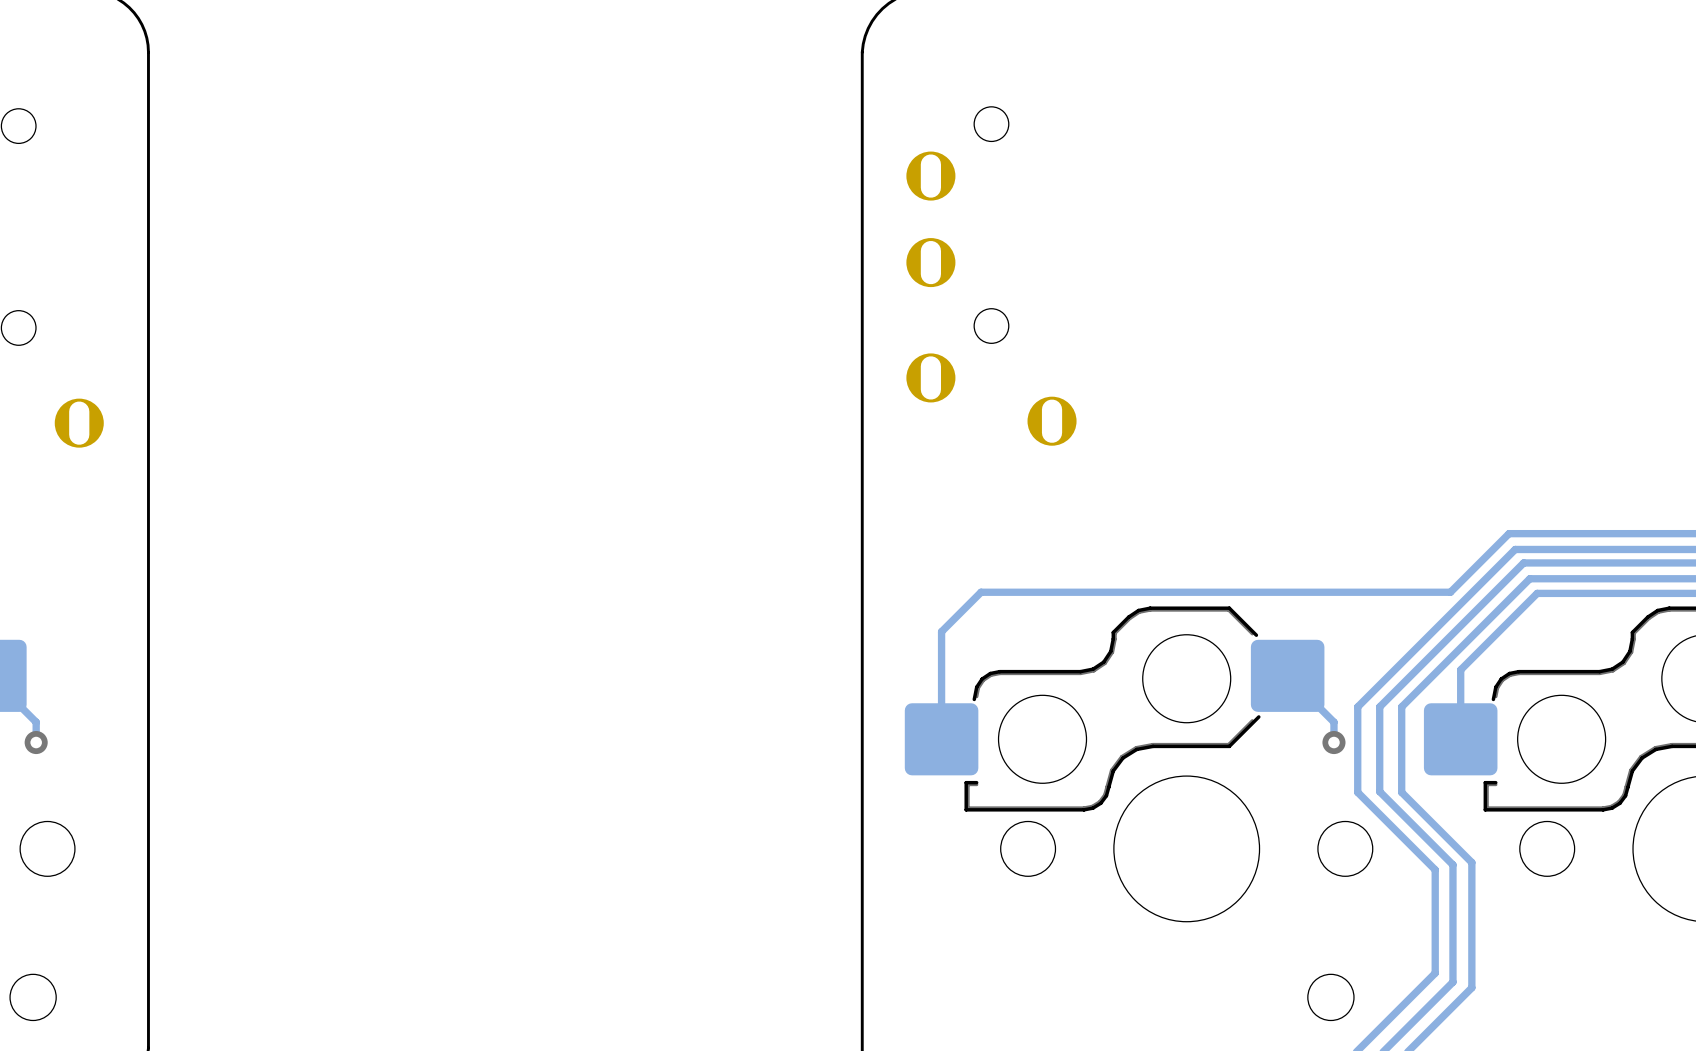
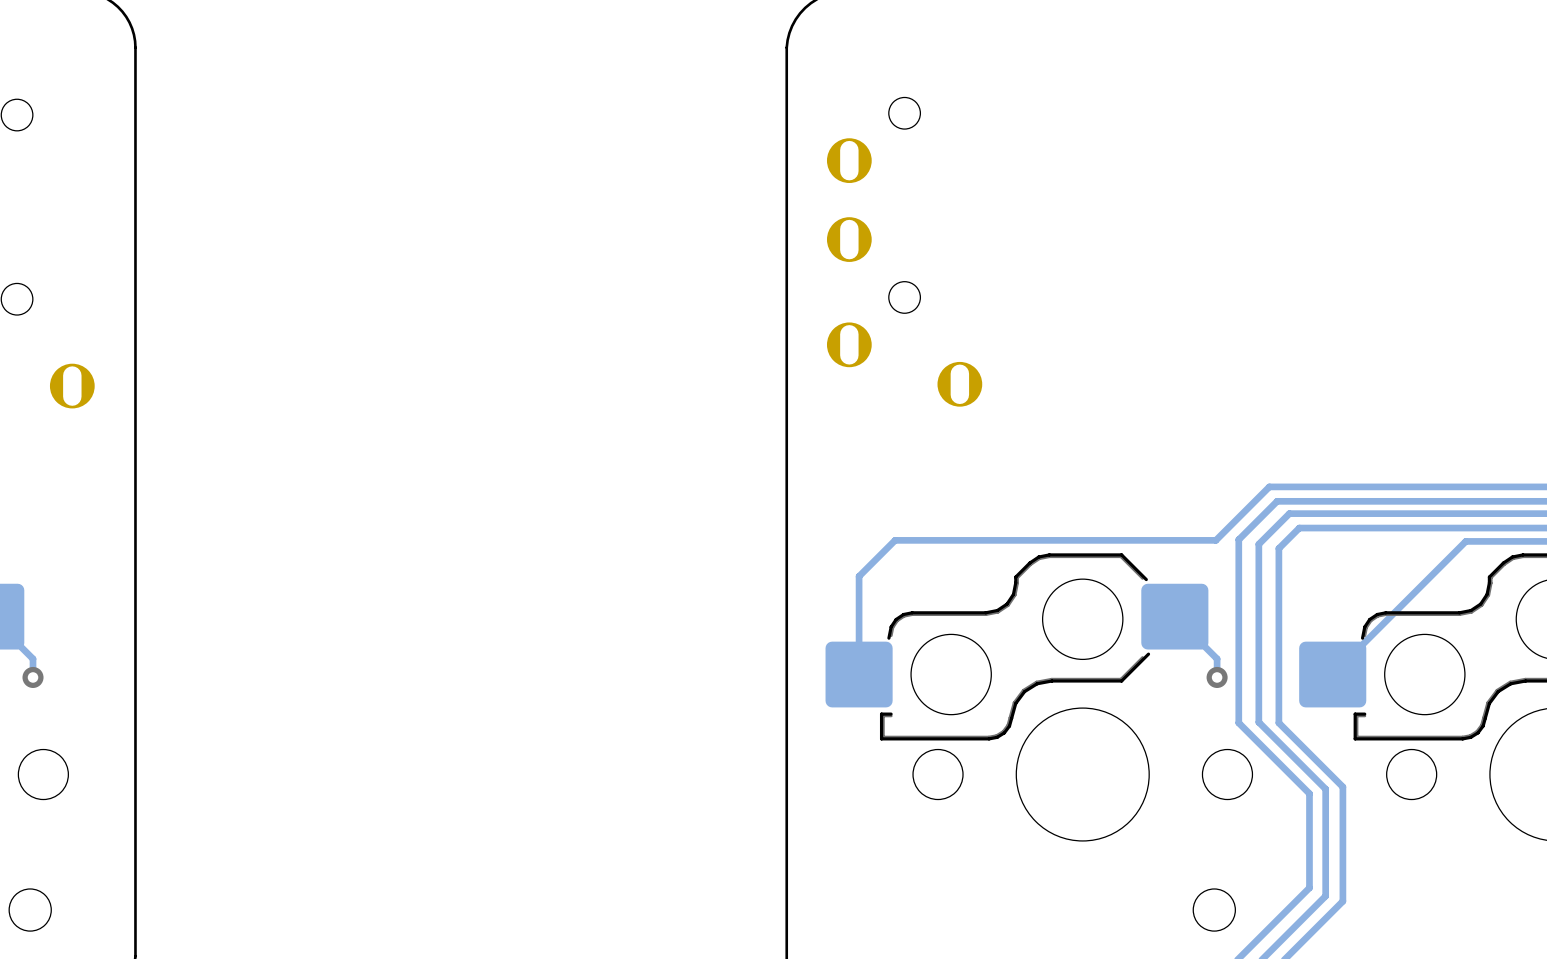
track: (1509, 533) (1450, 592) (1332, 592) -> (1376, 486) (1269, 486) (1215, 540)
track: (1515, 549) (1357, 706) -> (1382, 501) (1277, 501) (1238, 539) (1238, 645)
track: (1523, 562) (1379, 706) -> (1390, 513) (1289, 513) (1258, 544) (1258, 645)
track: (1529, 578) (1401, 706) -> (1395, 528) (1299, 528) (1278, 548) (1278, 645)
track: (1606, 593) (1537, 593) (1460, 669) (1460, 739) -> (1465, 541) (1332, 674)

